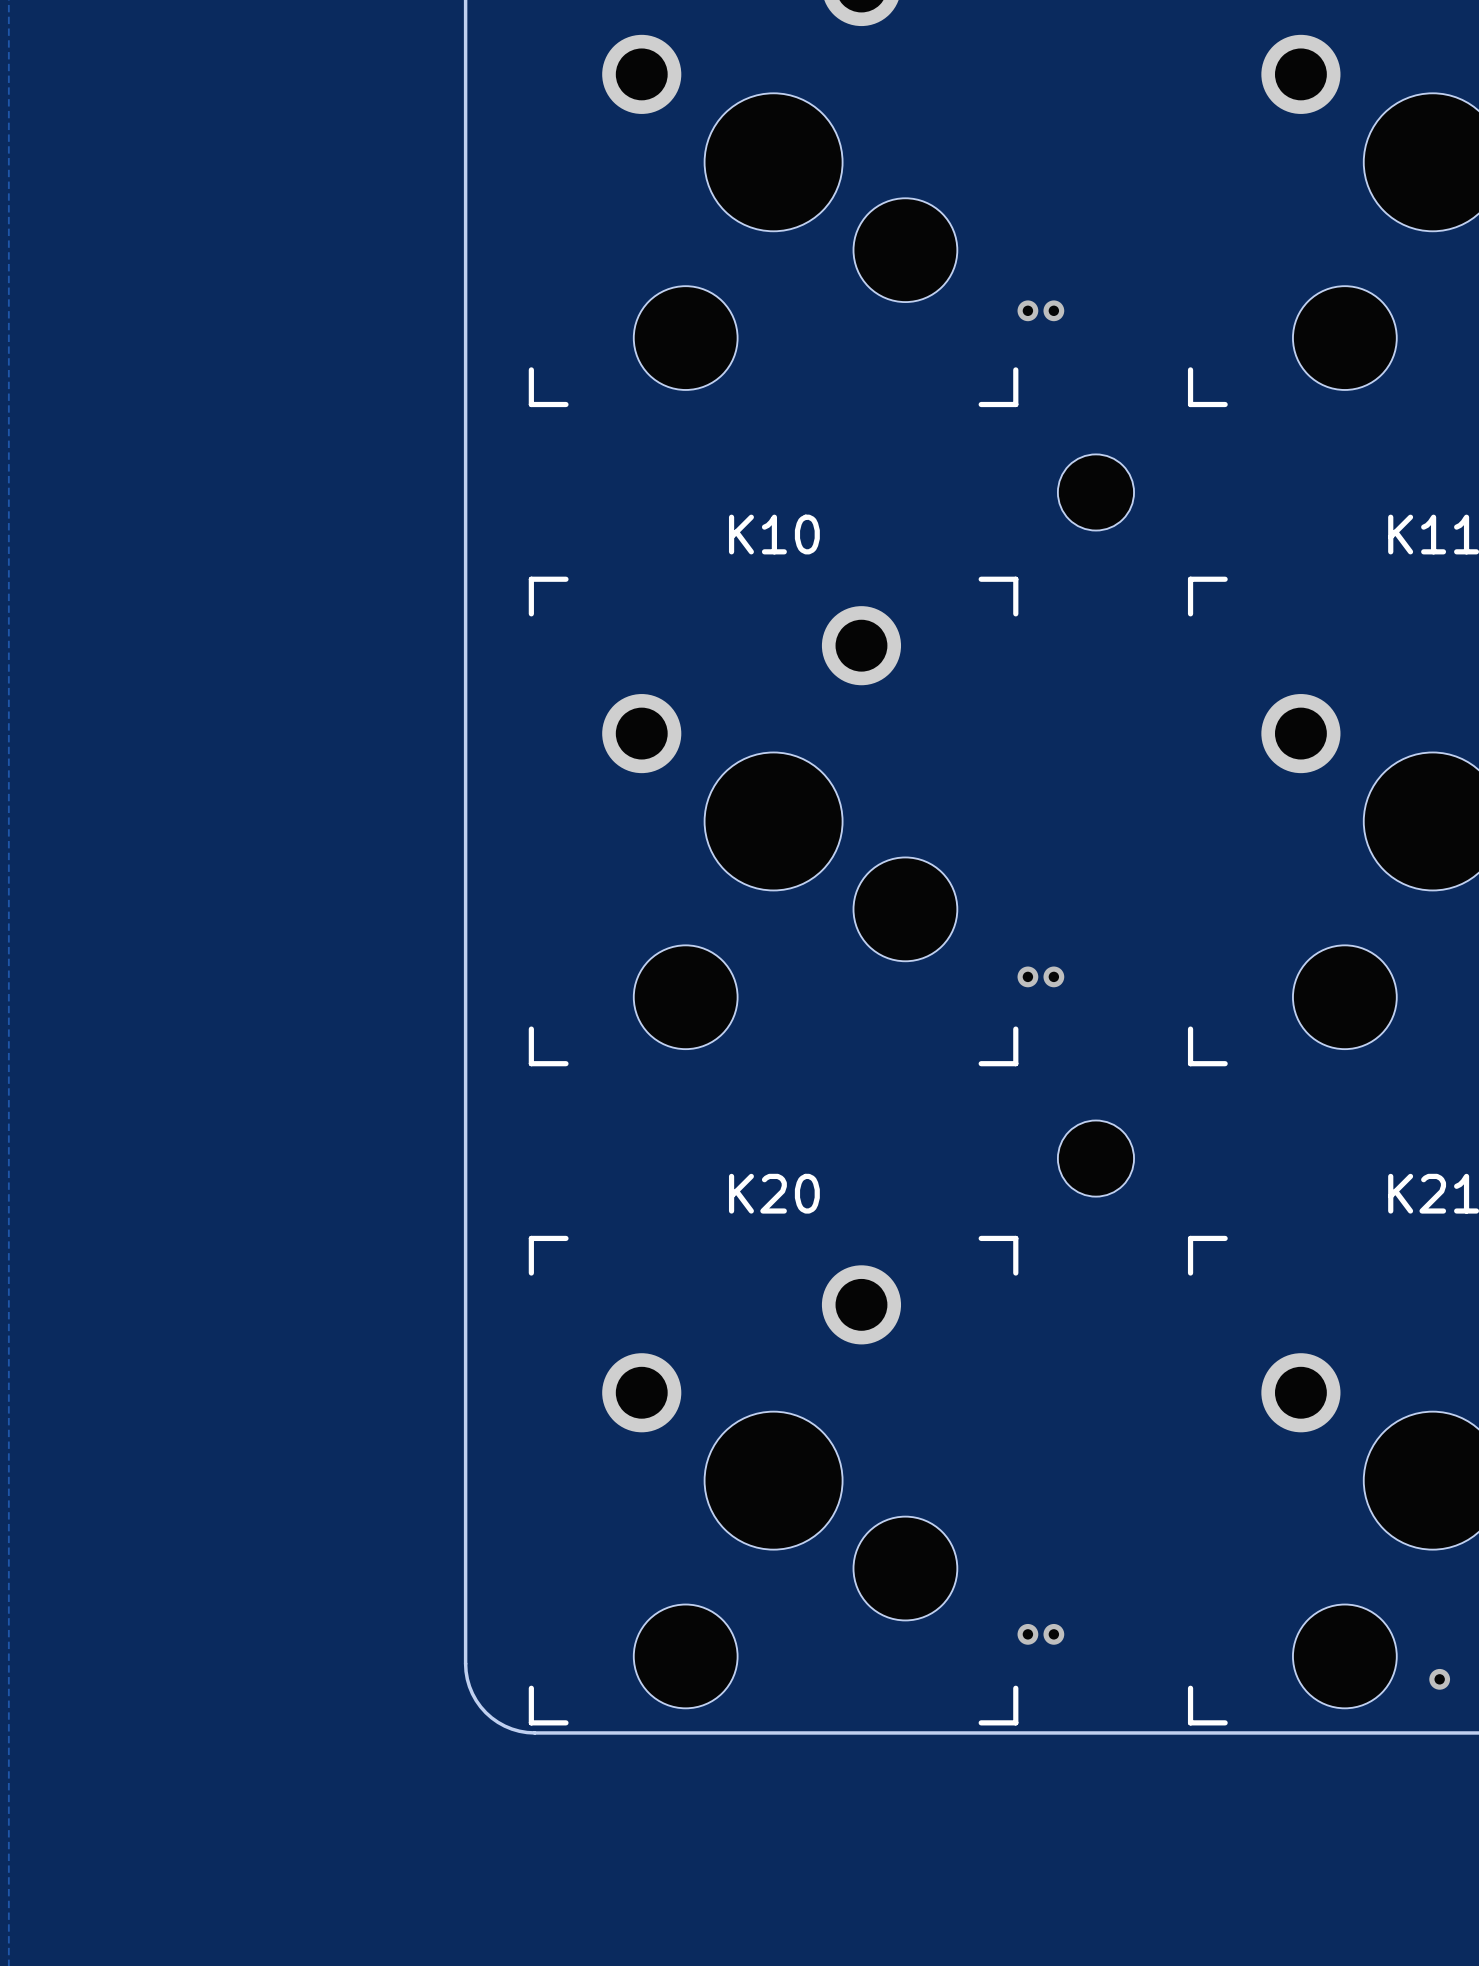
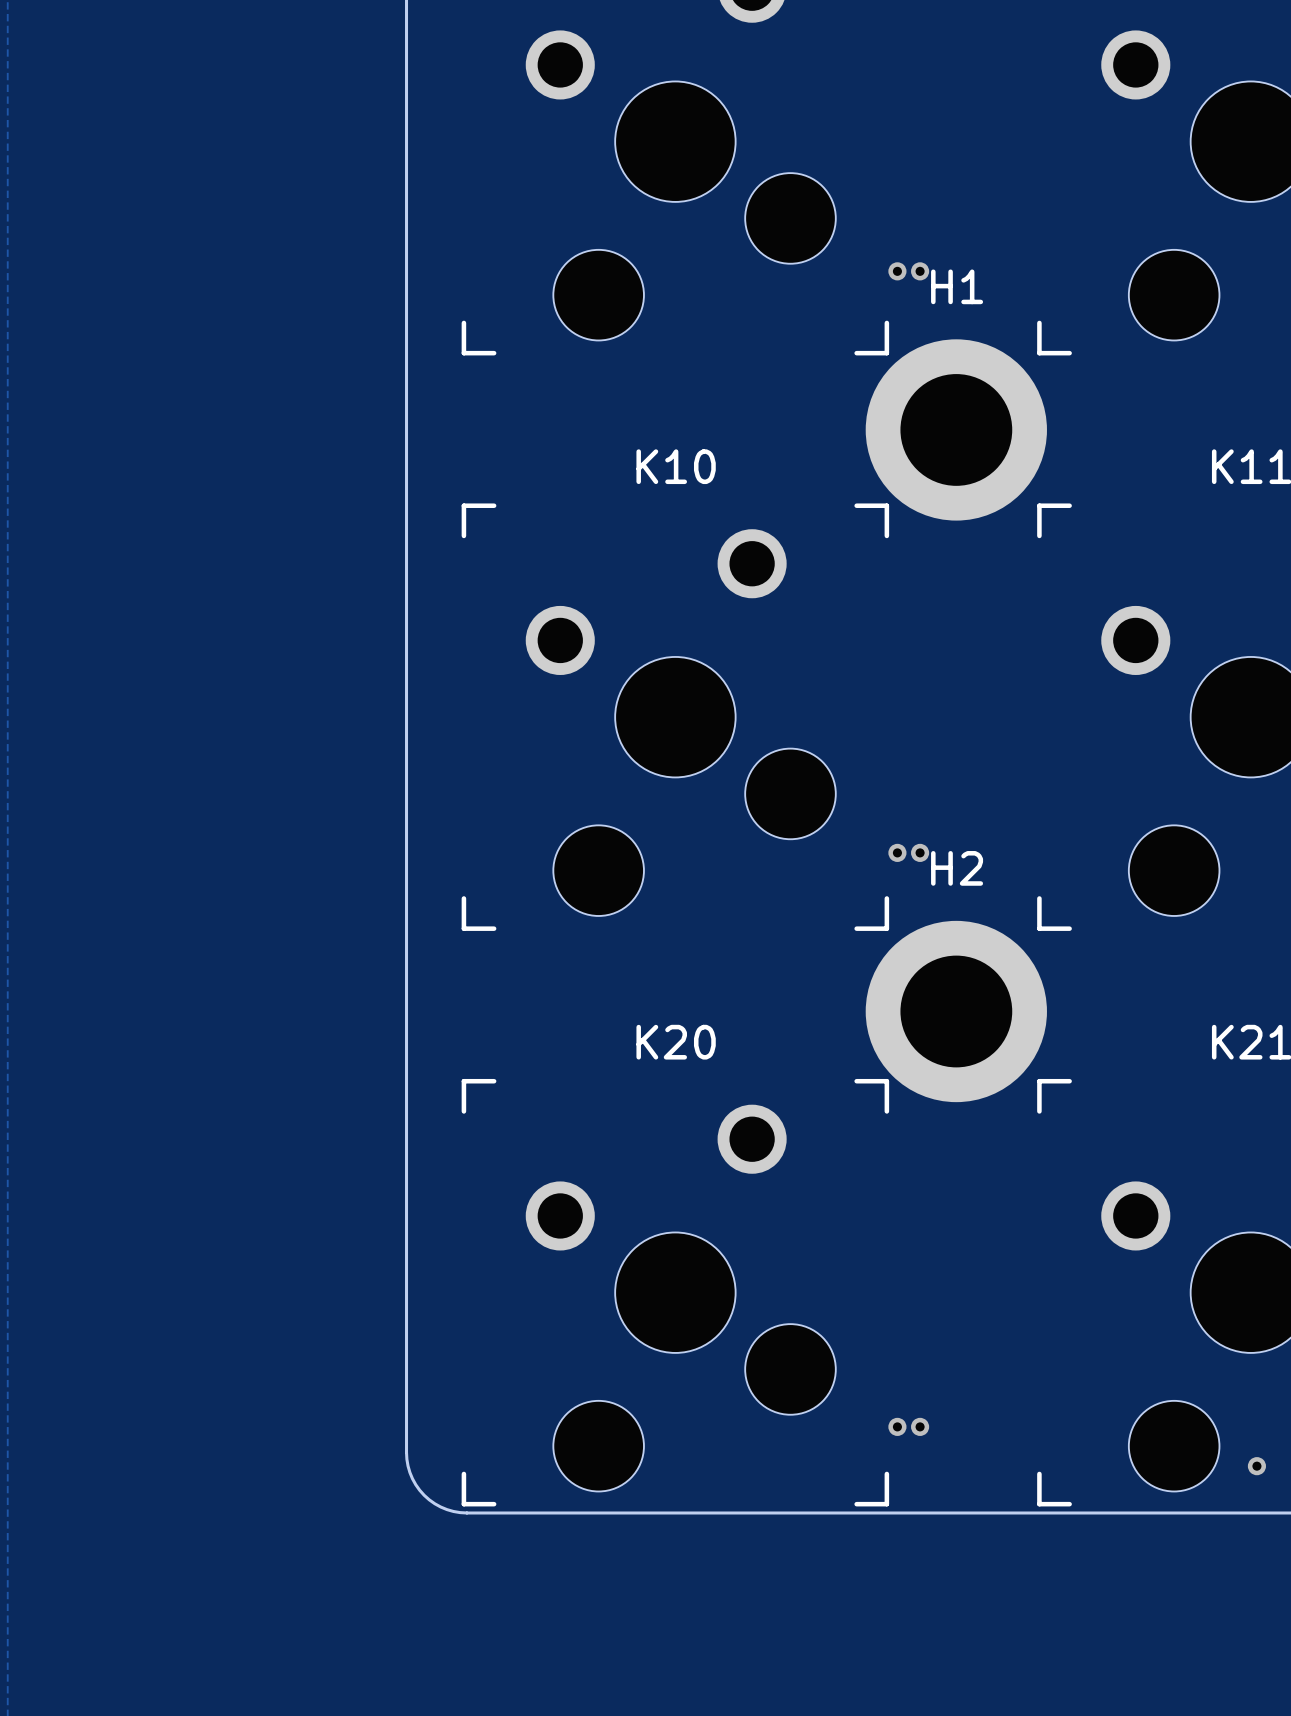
part: (1095, 492) -> none
H1: none -> (956, 429)
part: (1095, 1158) -> none
H2: none -> (956, 1011)

